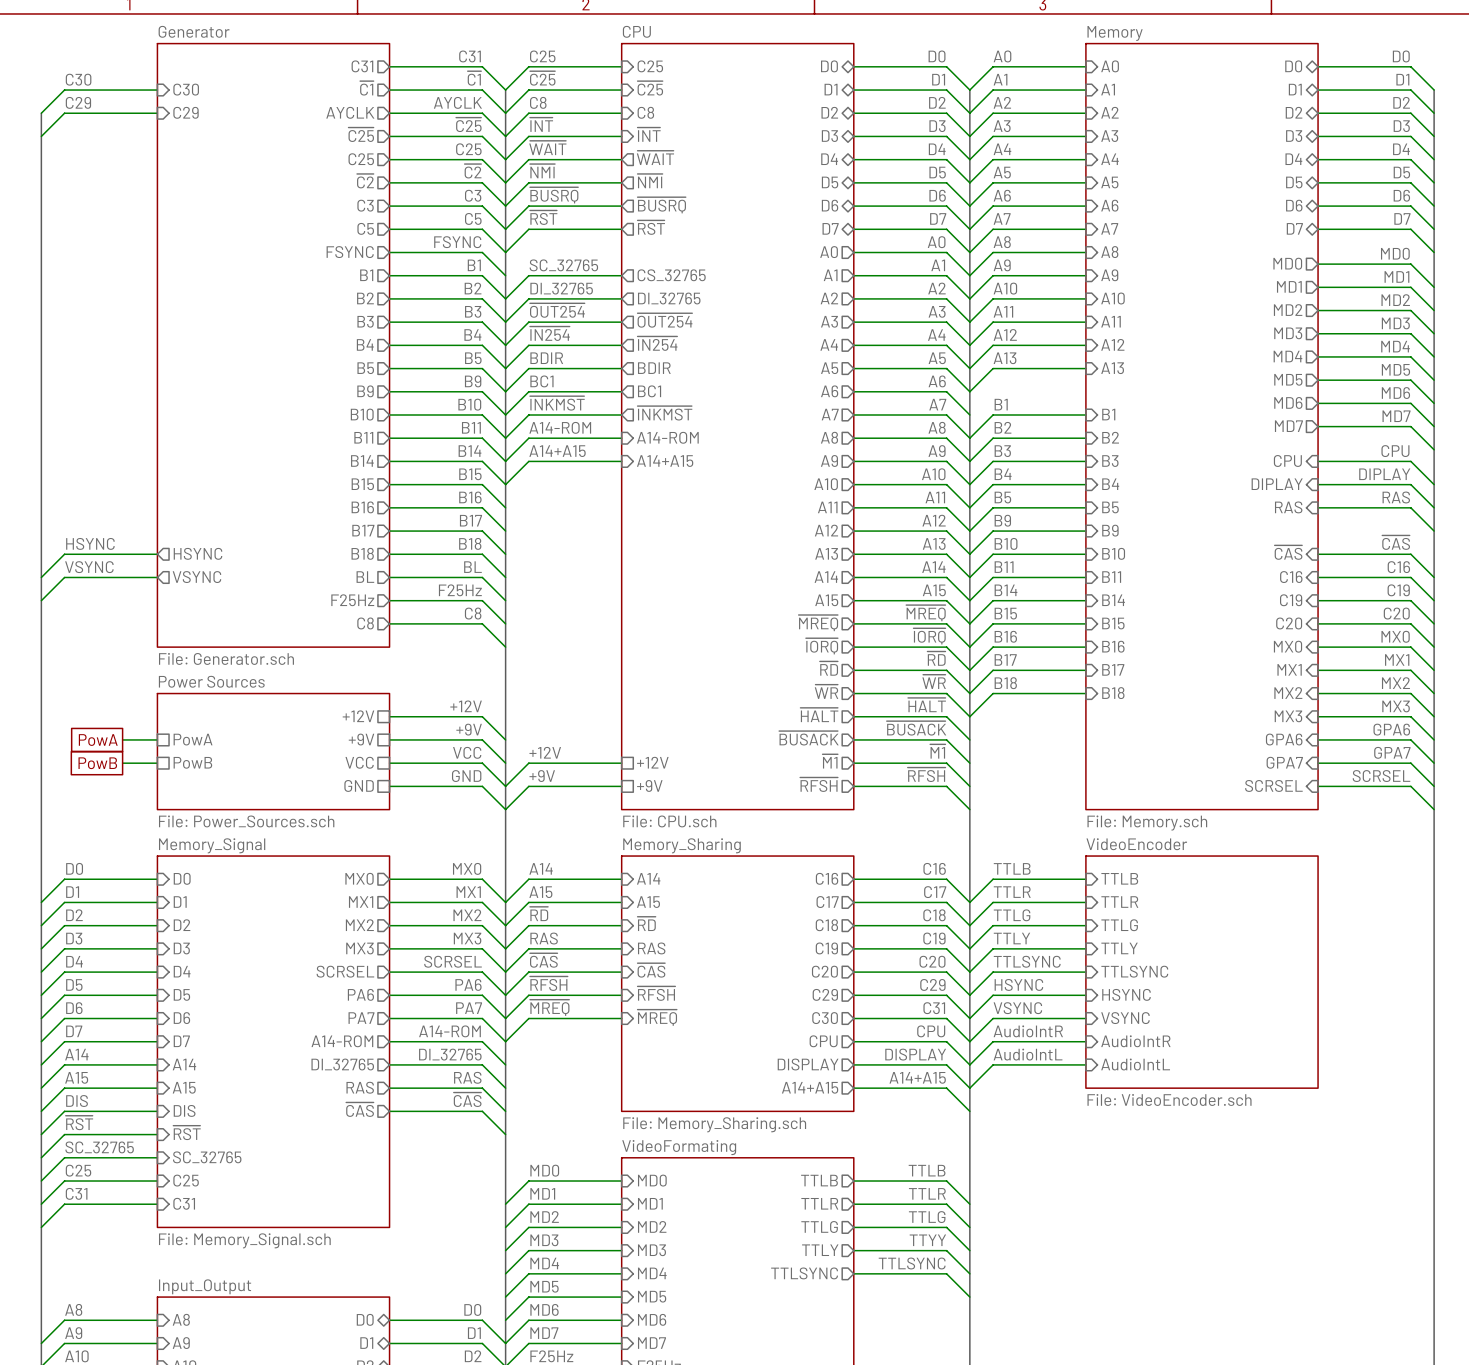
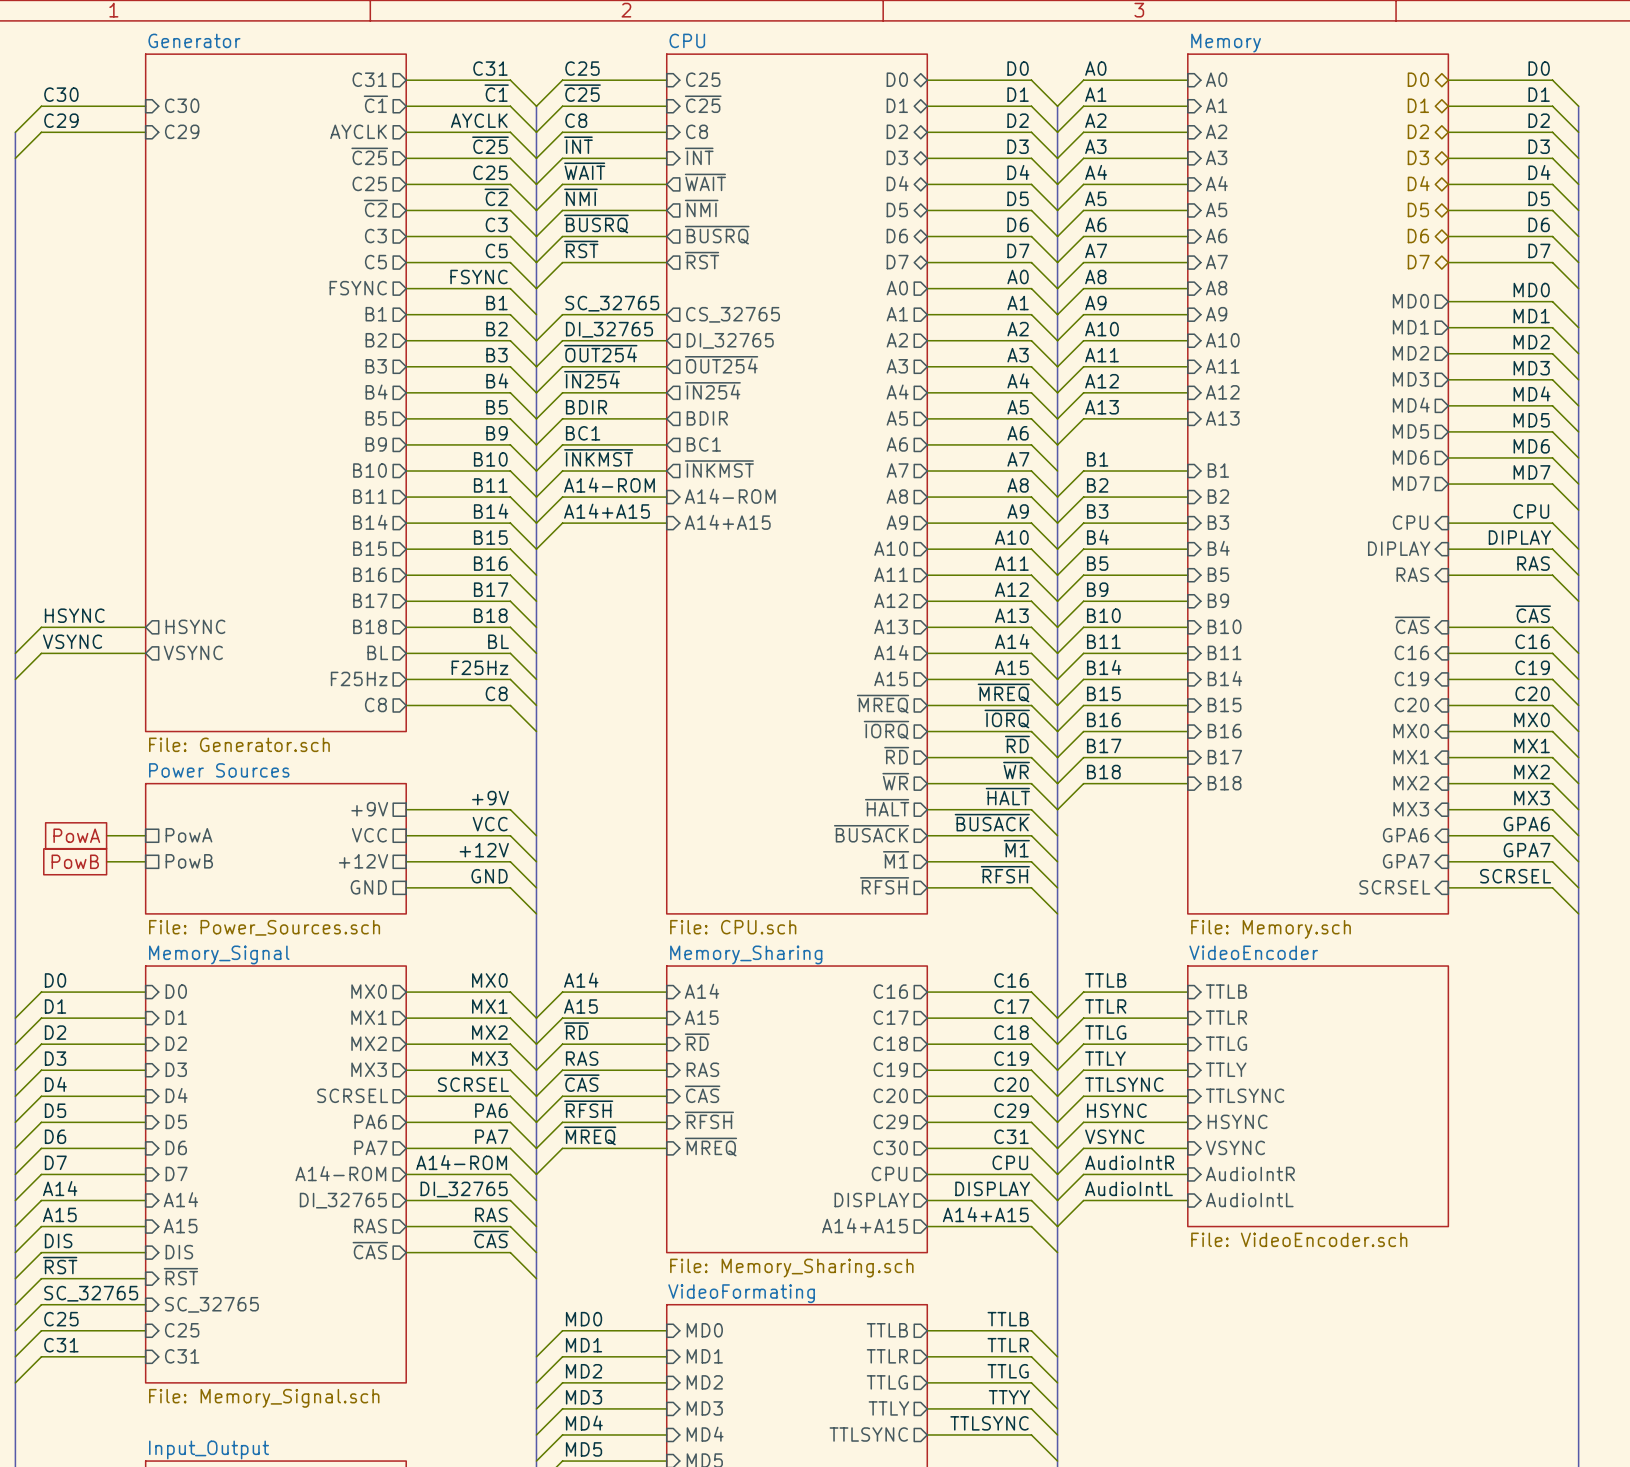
label: +12V (466, 706) -> +9V (490, 798)
sheet pin: +12V (358, 716) -> +9V (369, 809)
label: +9V (469, 729) -> VCC (490, 824)
sheet pin: +9V (361, 739) -> VCC (369, 835)
label: VCC (467, 752) -> +12V (484, 850)
label: +12V (545, 752) -> none
sheet pin: VCC (359, 762) -> +12V (363, 861)
sheet pin: +12V (652, 762) -> none
wire: (621, 763) (528, 763) (505, 786) -> none
label: +9V (542, 776) -> none
sheet pin: +9V (649, 785) -> none
wire: (621, 786) (528, 786) (505, 809) -> none

